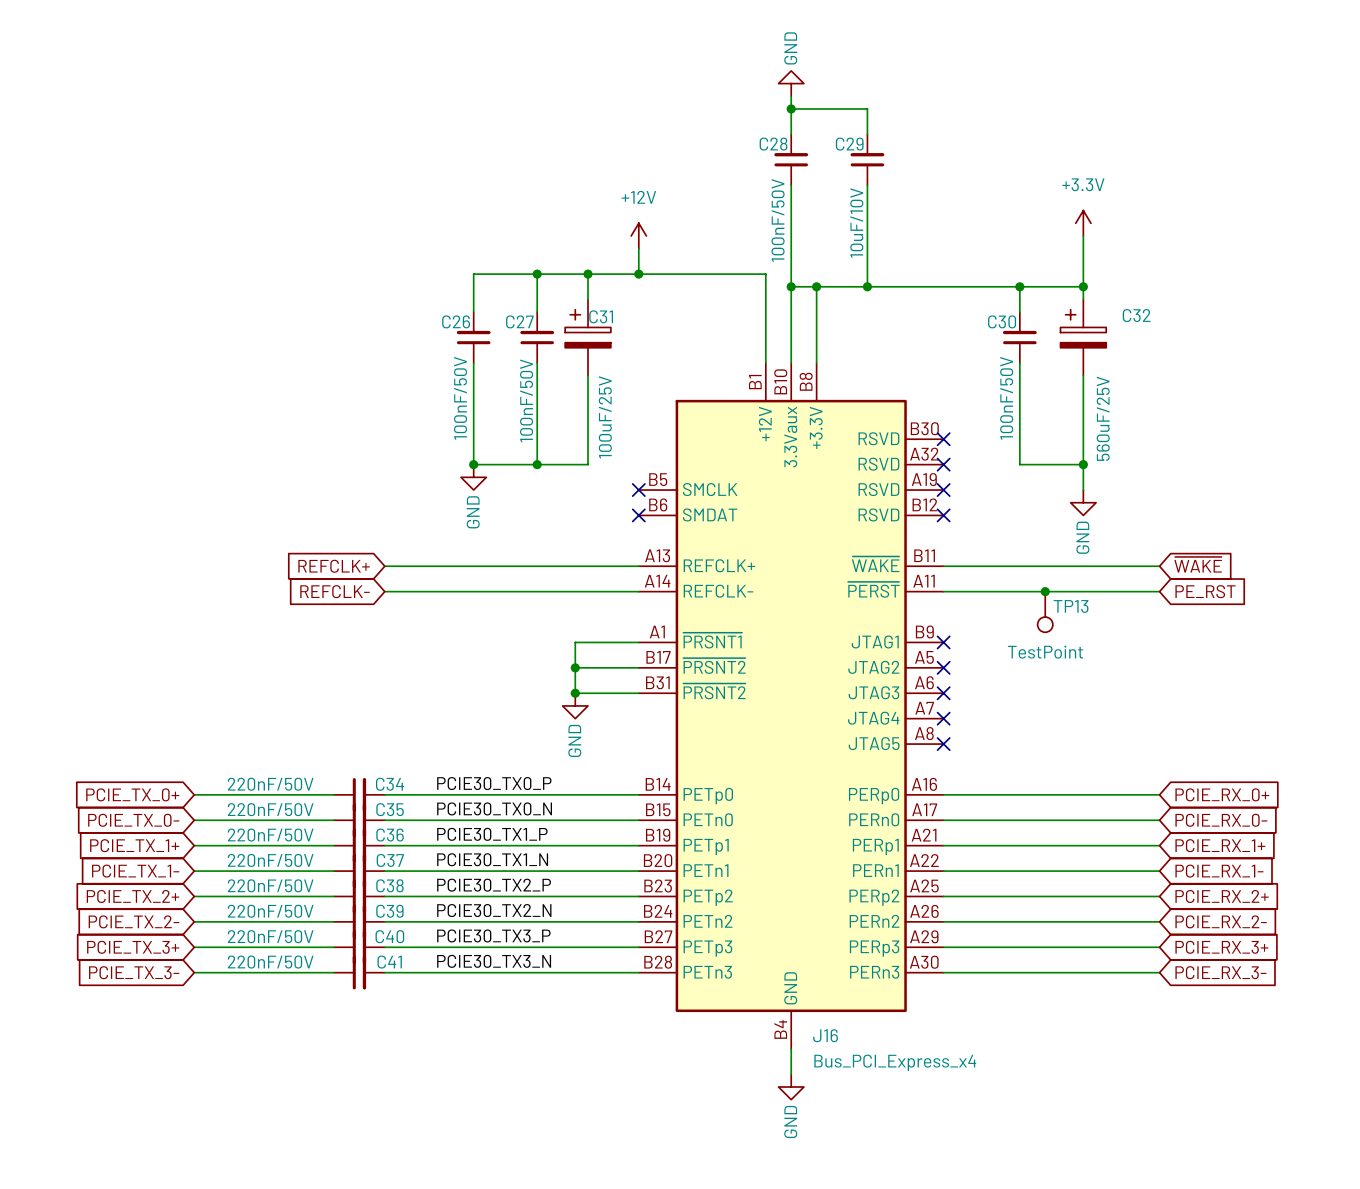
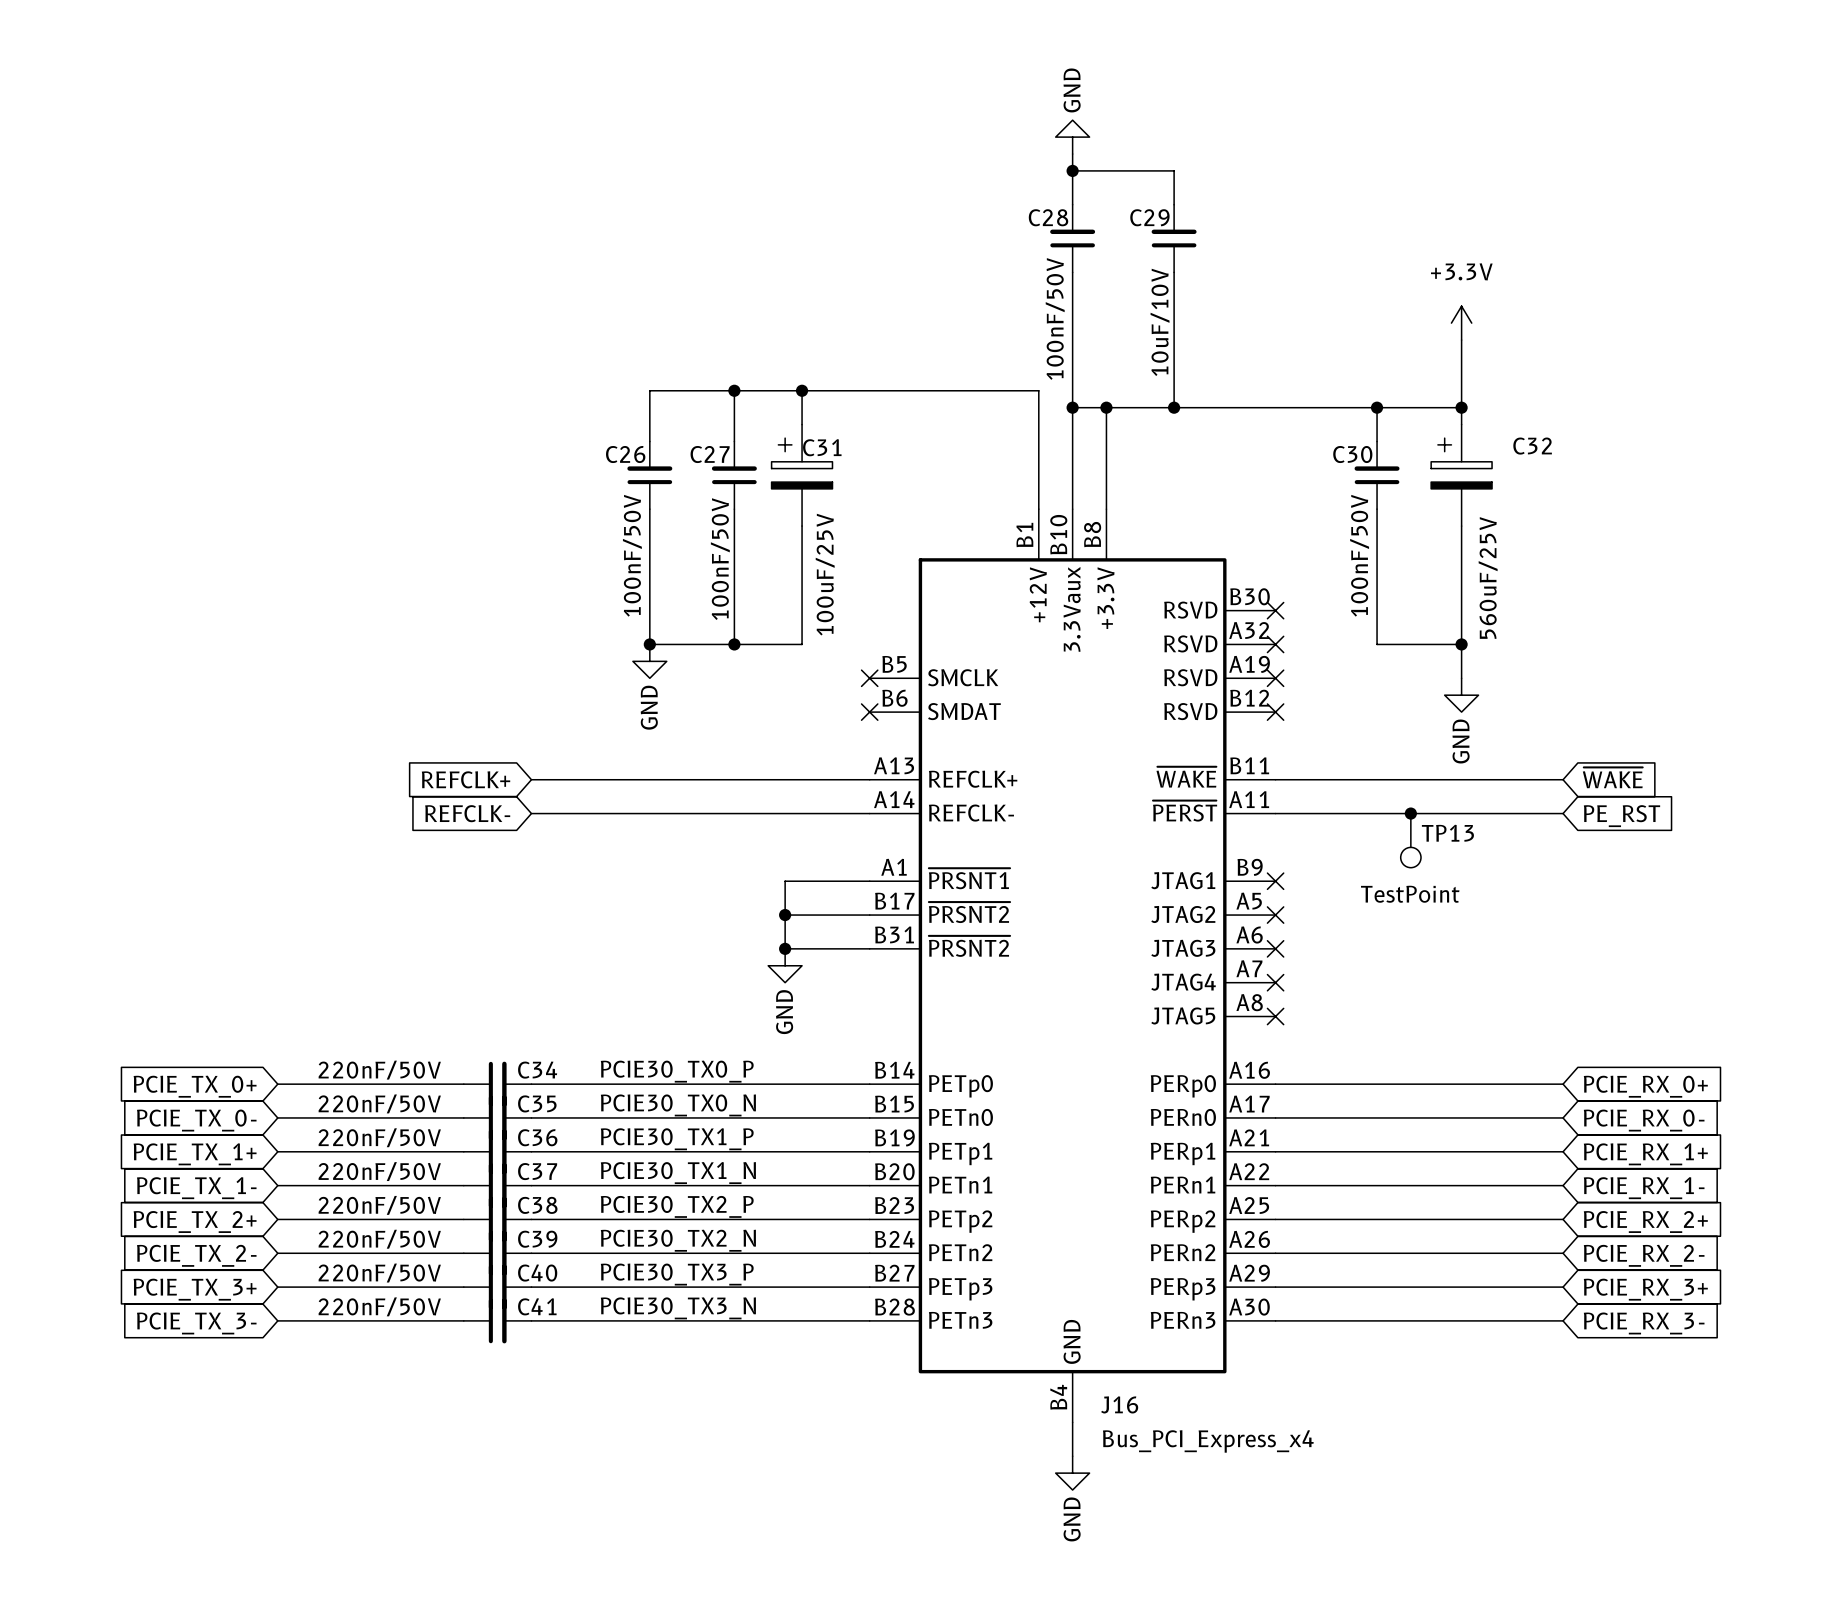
power symbol: +12V (638, 236) -> none
wire: (638, 248) (638, 274) -> none
junction: (638, 274) -> none

